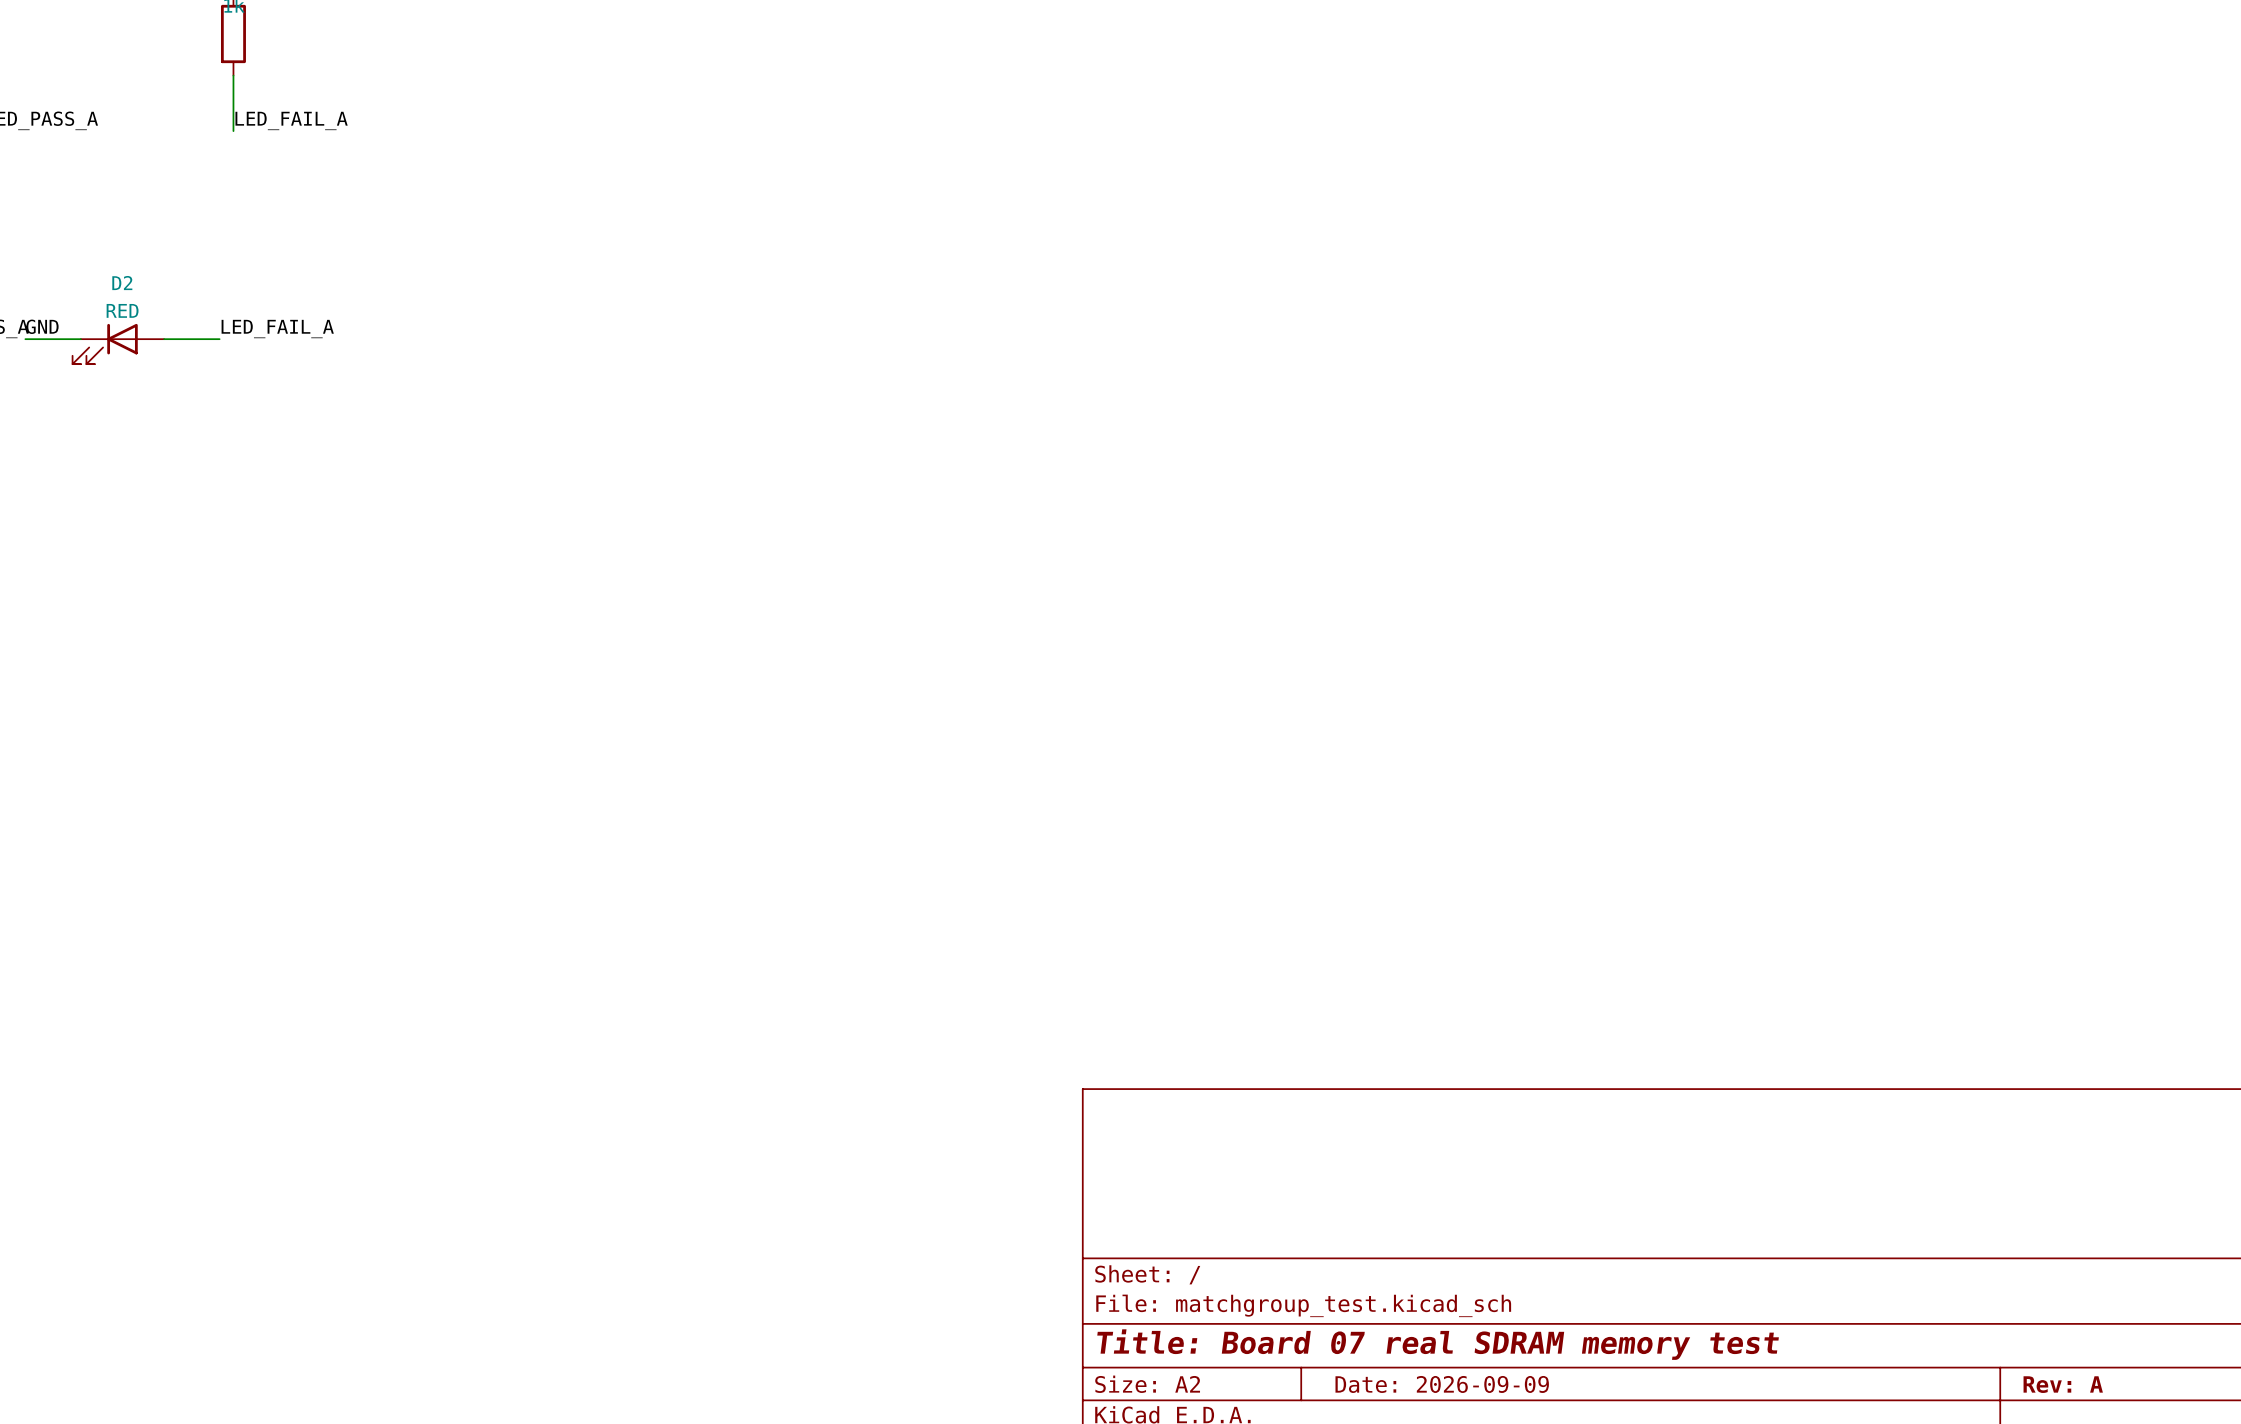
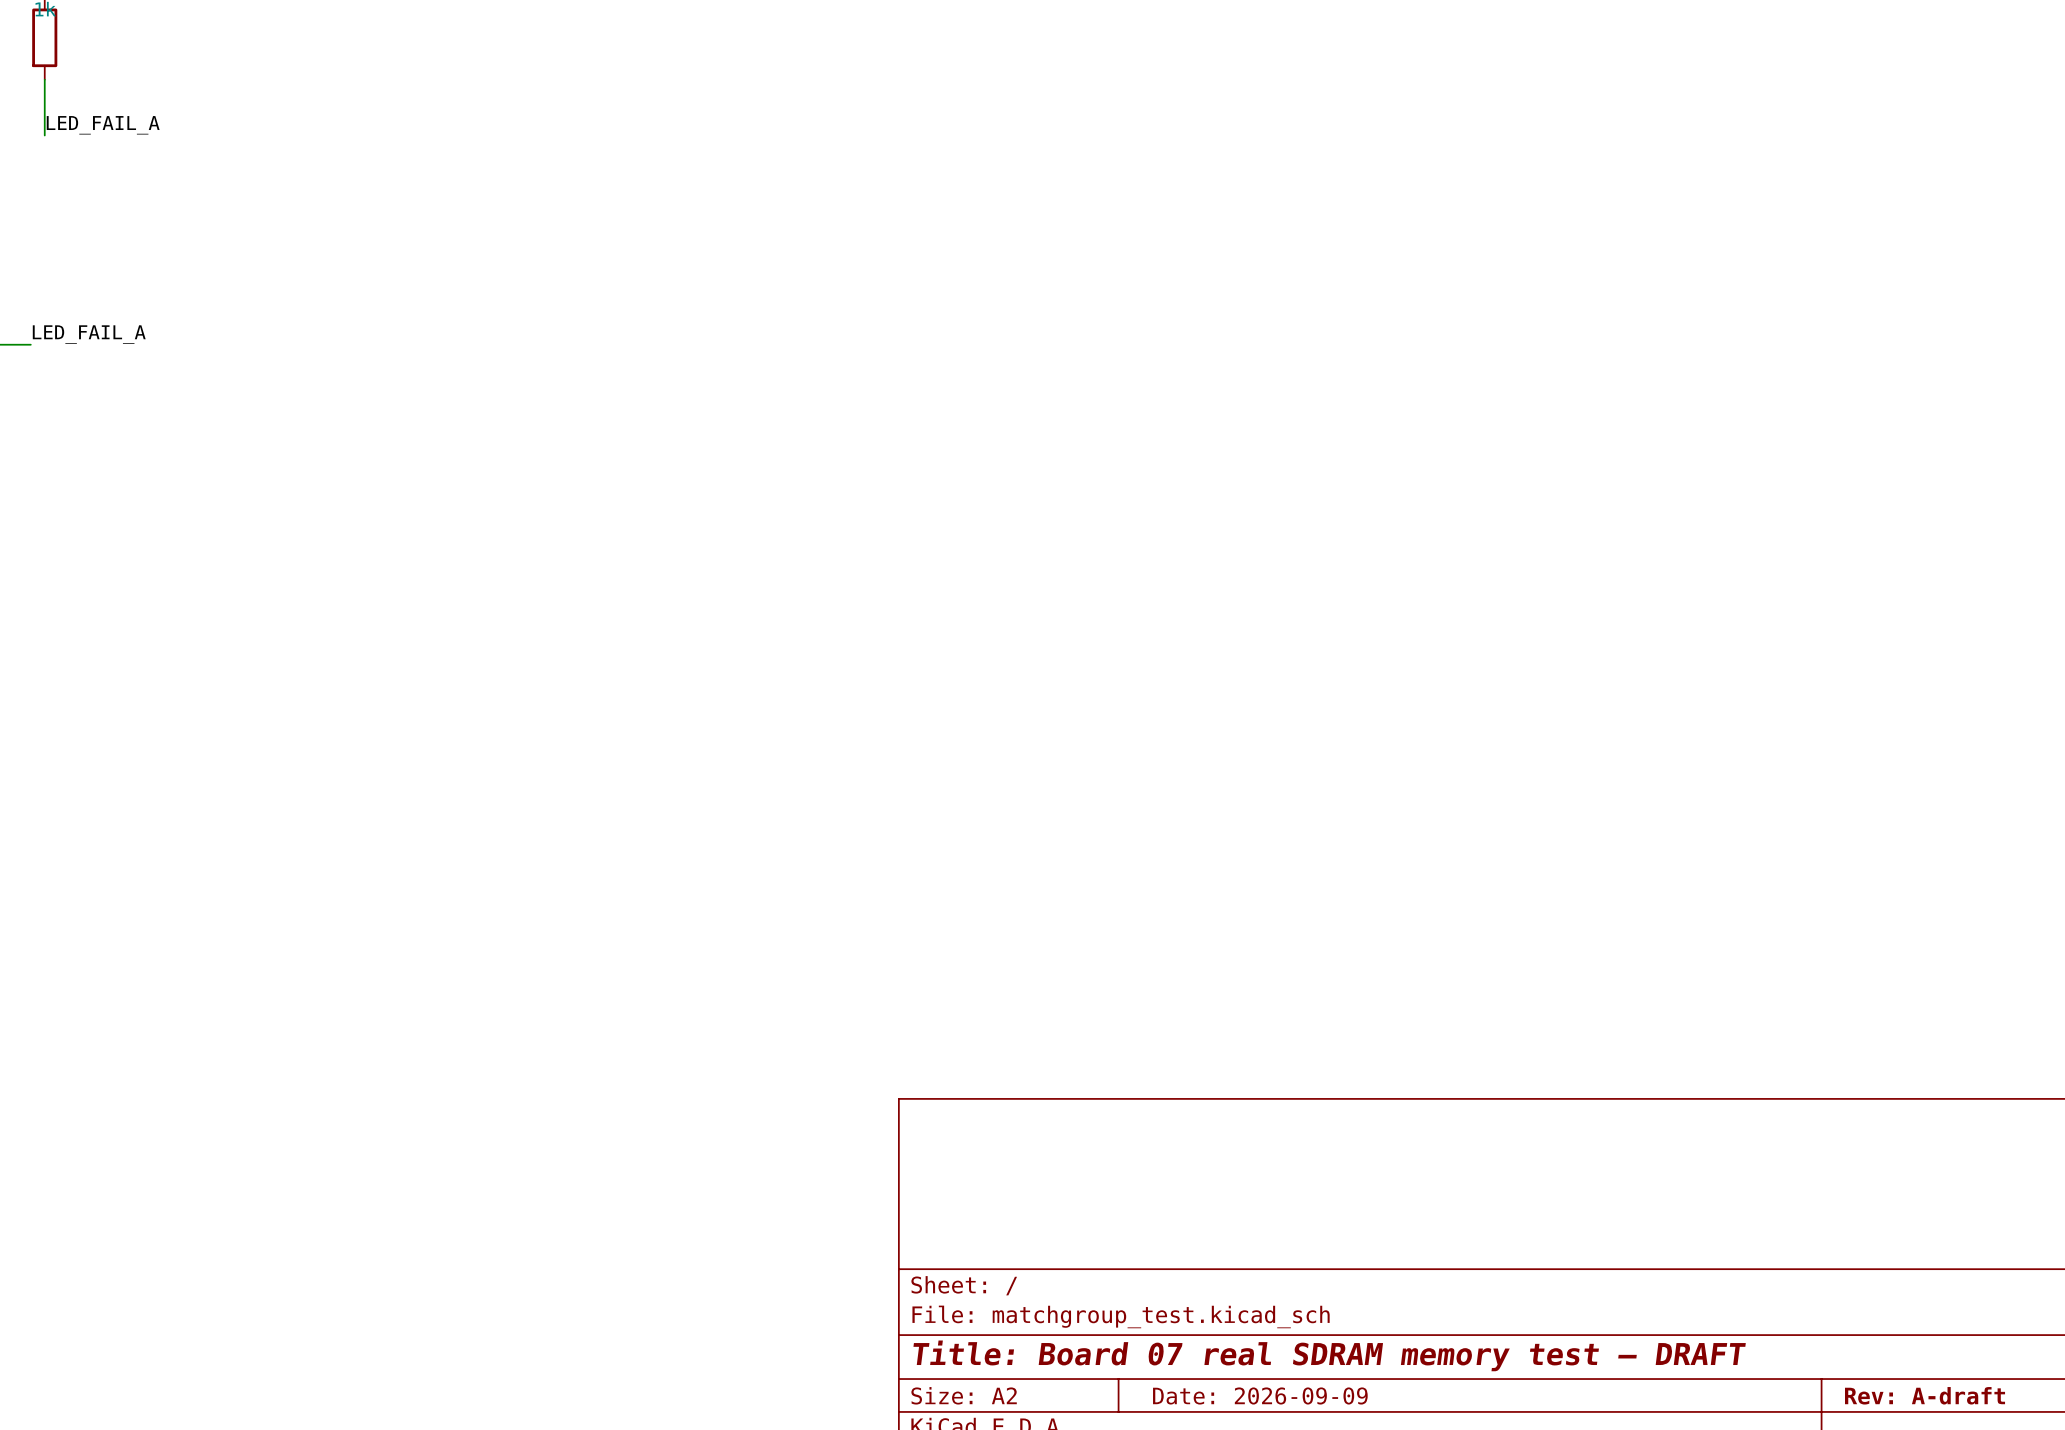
title block: Title: Board 07 real SDRAM memory test (1438, 1344) -> Title: Board 07 real SDRAM memory test — DRAFT (1329, 1355)
title block: Rev: A (2063, 1384) -> Rev: A-draft (1925, 1395)

